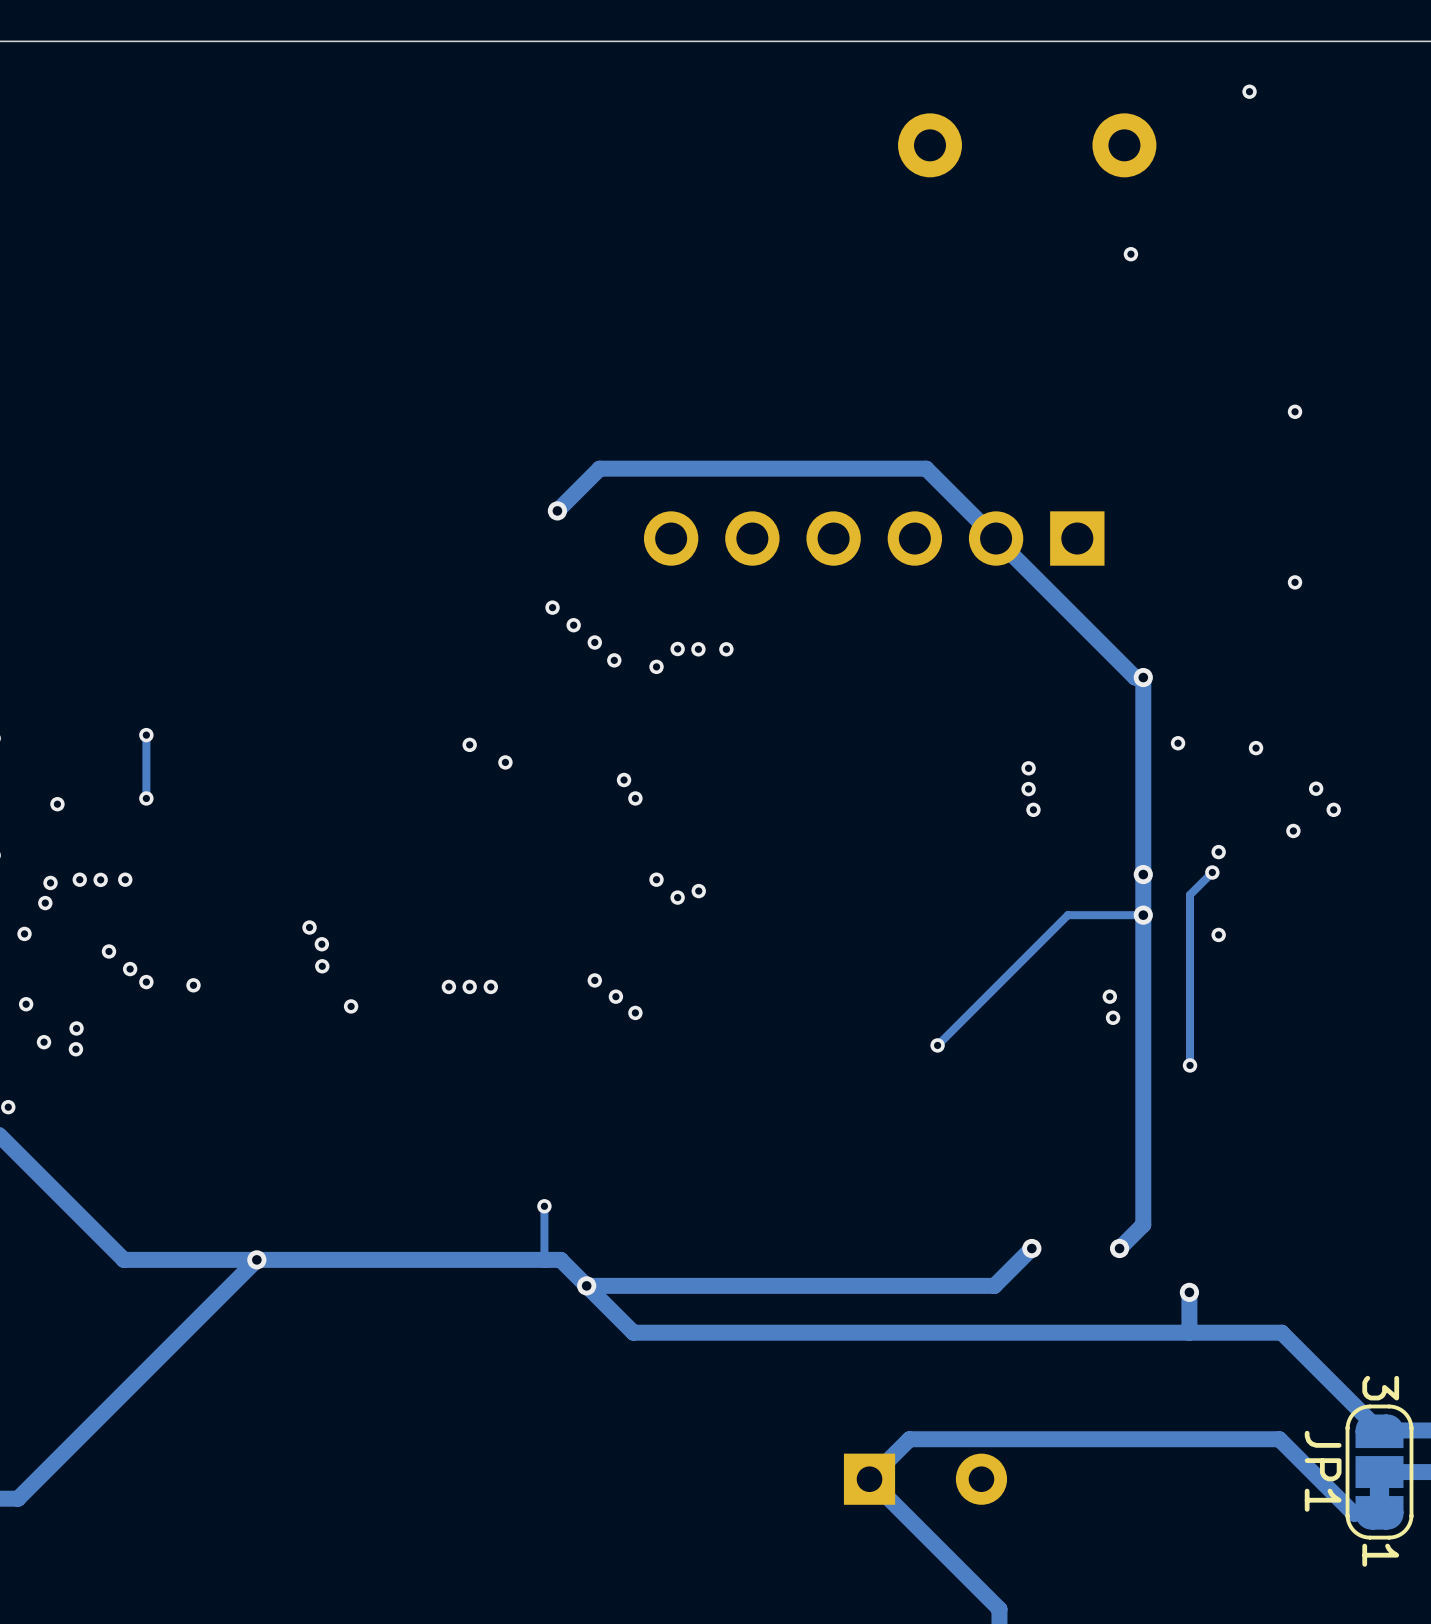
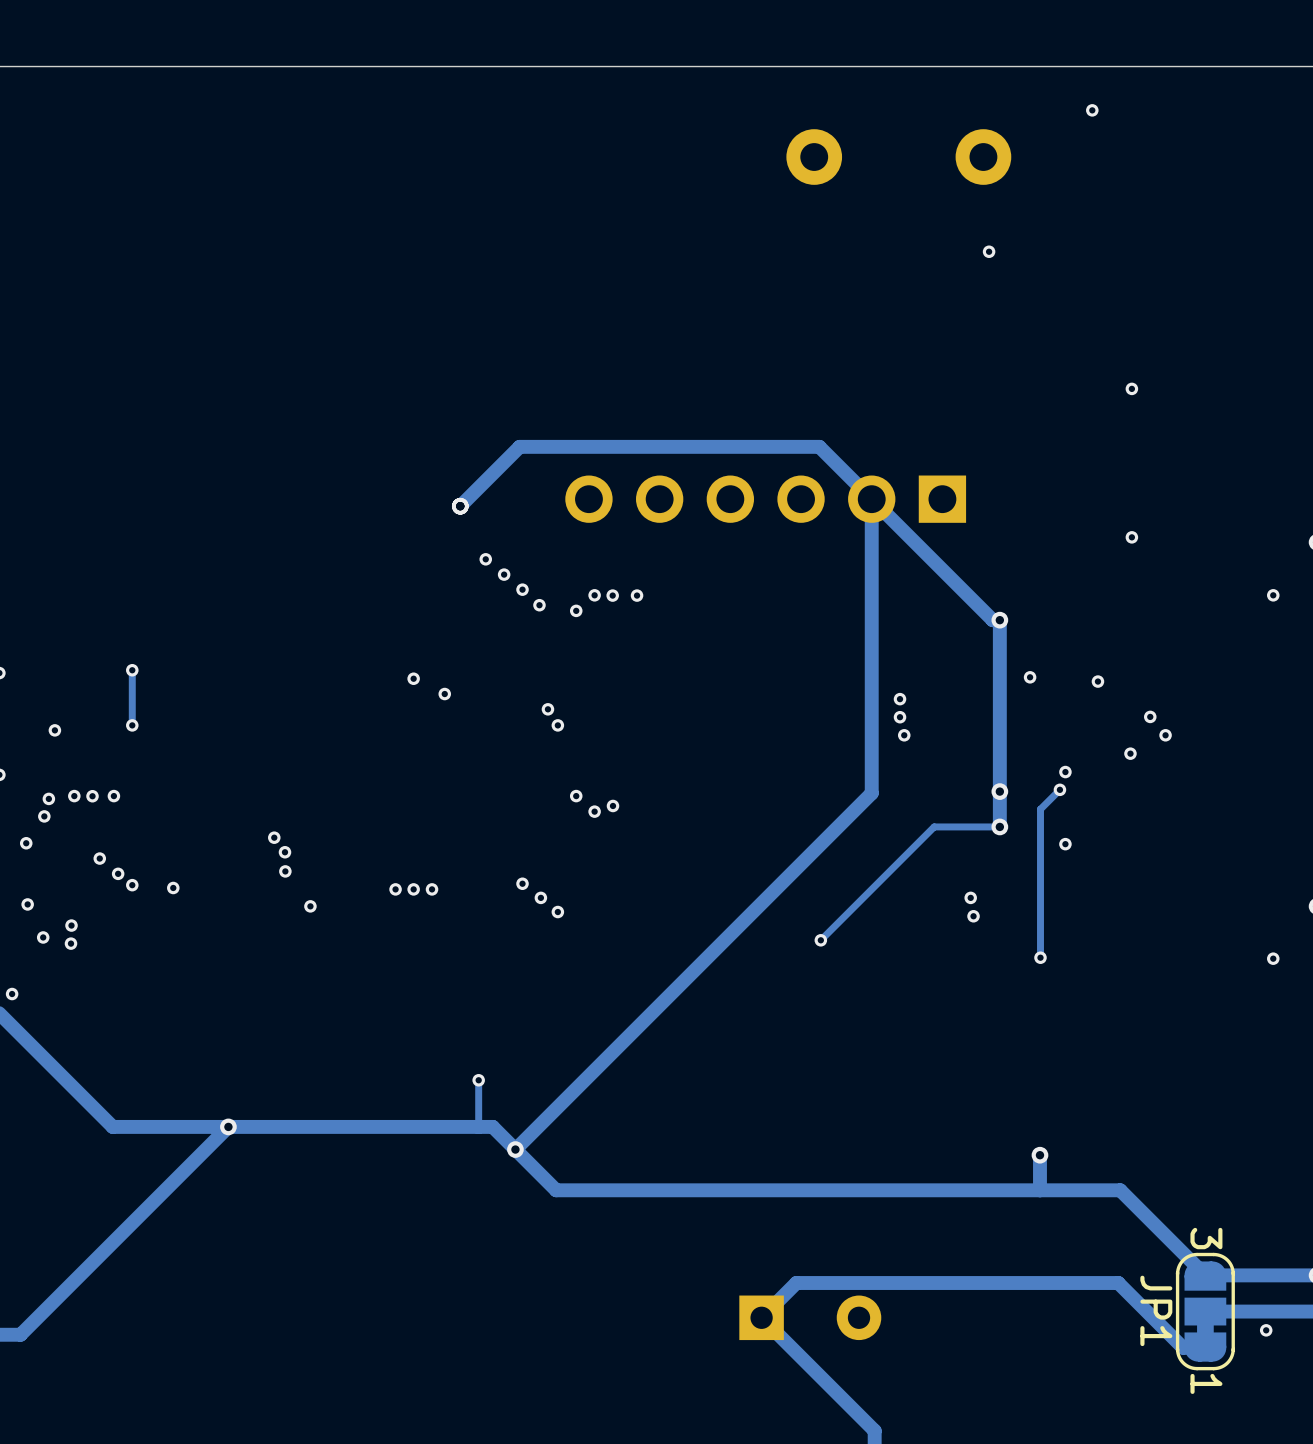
track: (935, 478) (926, 468) (599, 468) (557, 510) -> (819, 446) (519, 446) (460, 506)
via position: (557, 510) -> (460, 506)
track: (1143, 915) (1143, 1224) (1119, 1248) -> none
track: (1031, 1248) (994, 1285) (586, 1285) -> (871, 499) (871, 793) (515, 1149)
via: (1031, 1248) -> none
via: (1119, 1248) -> none

